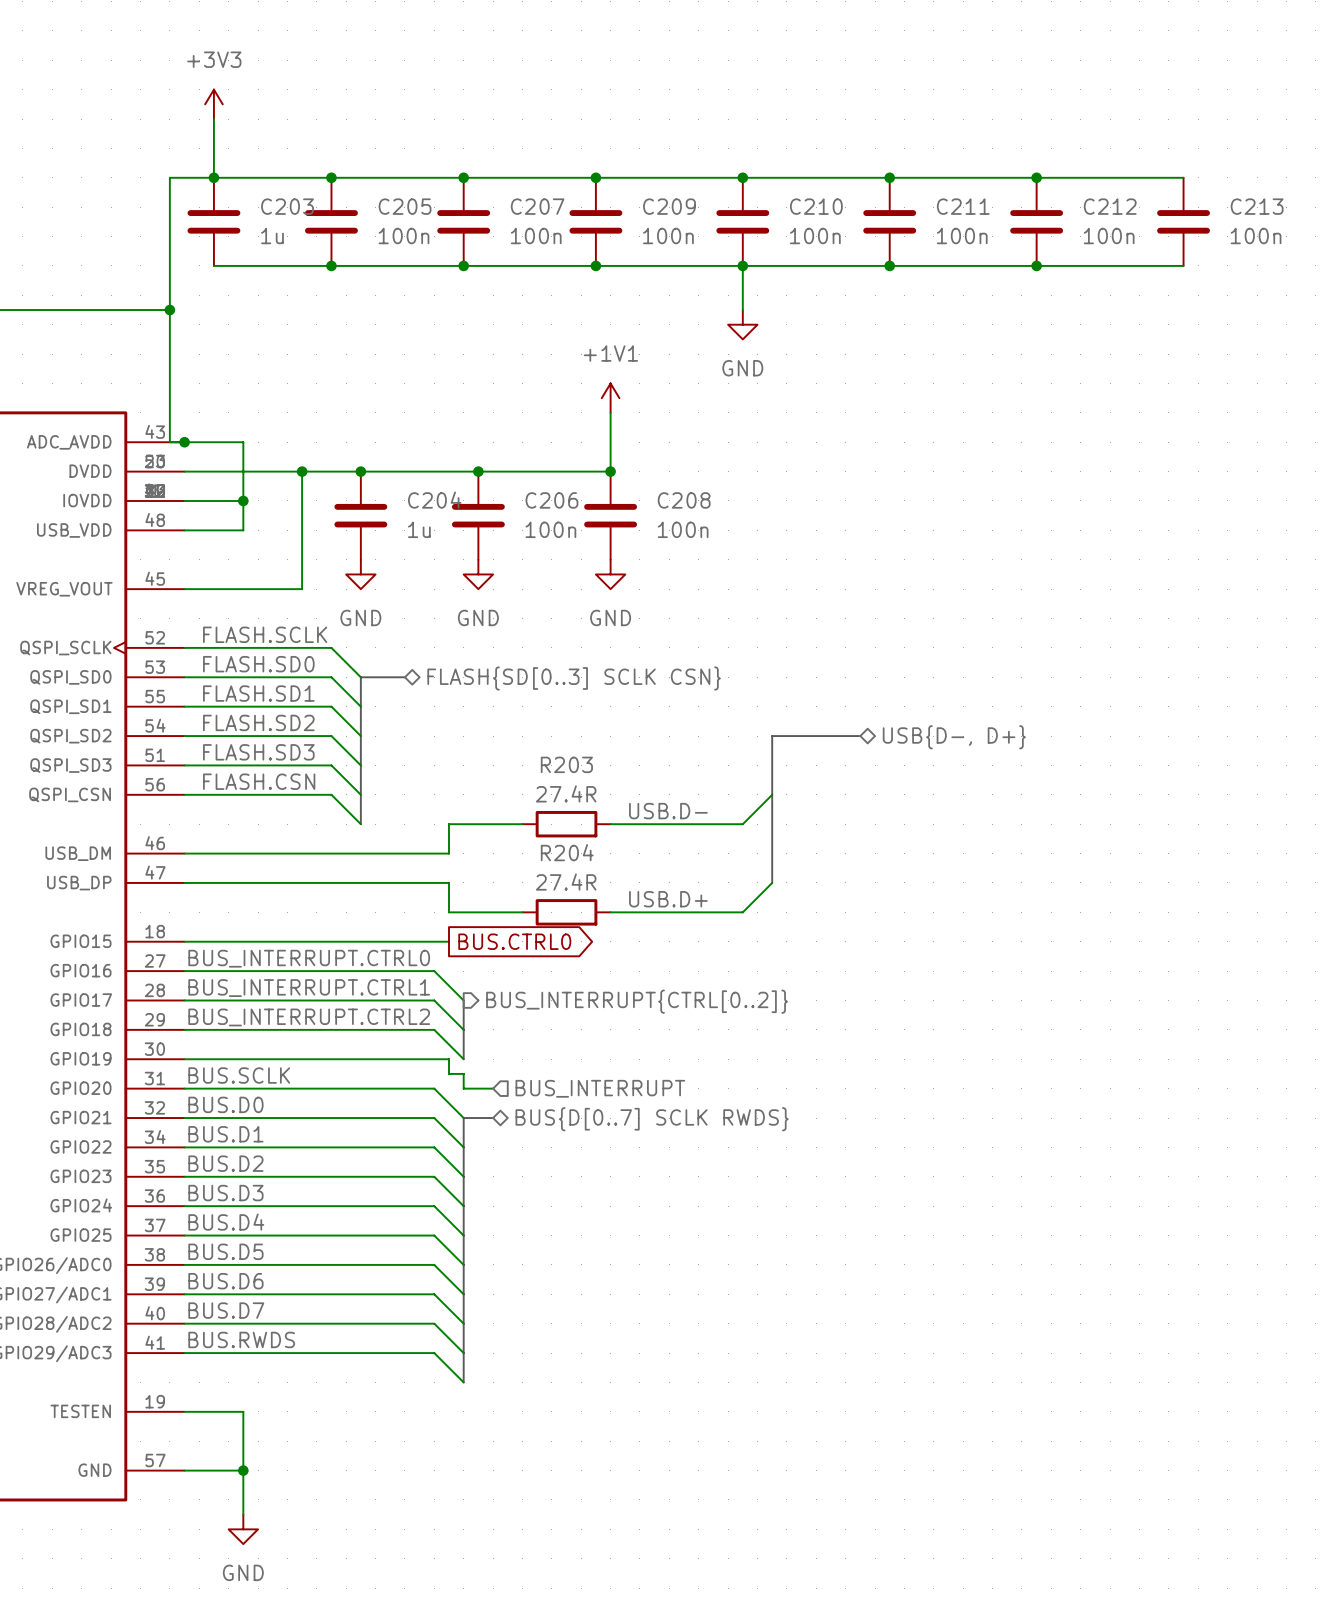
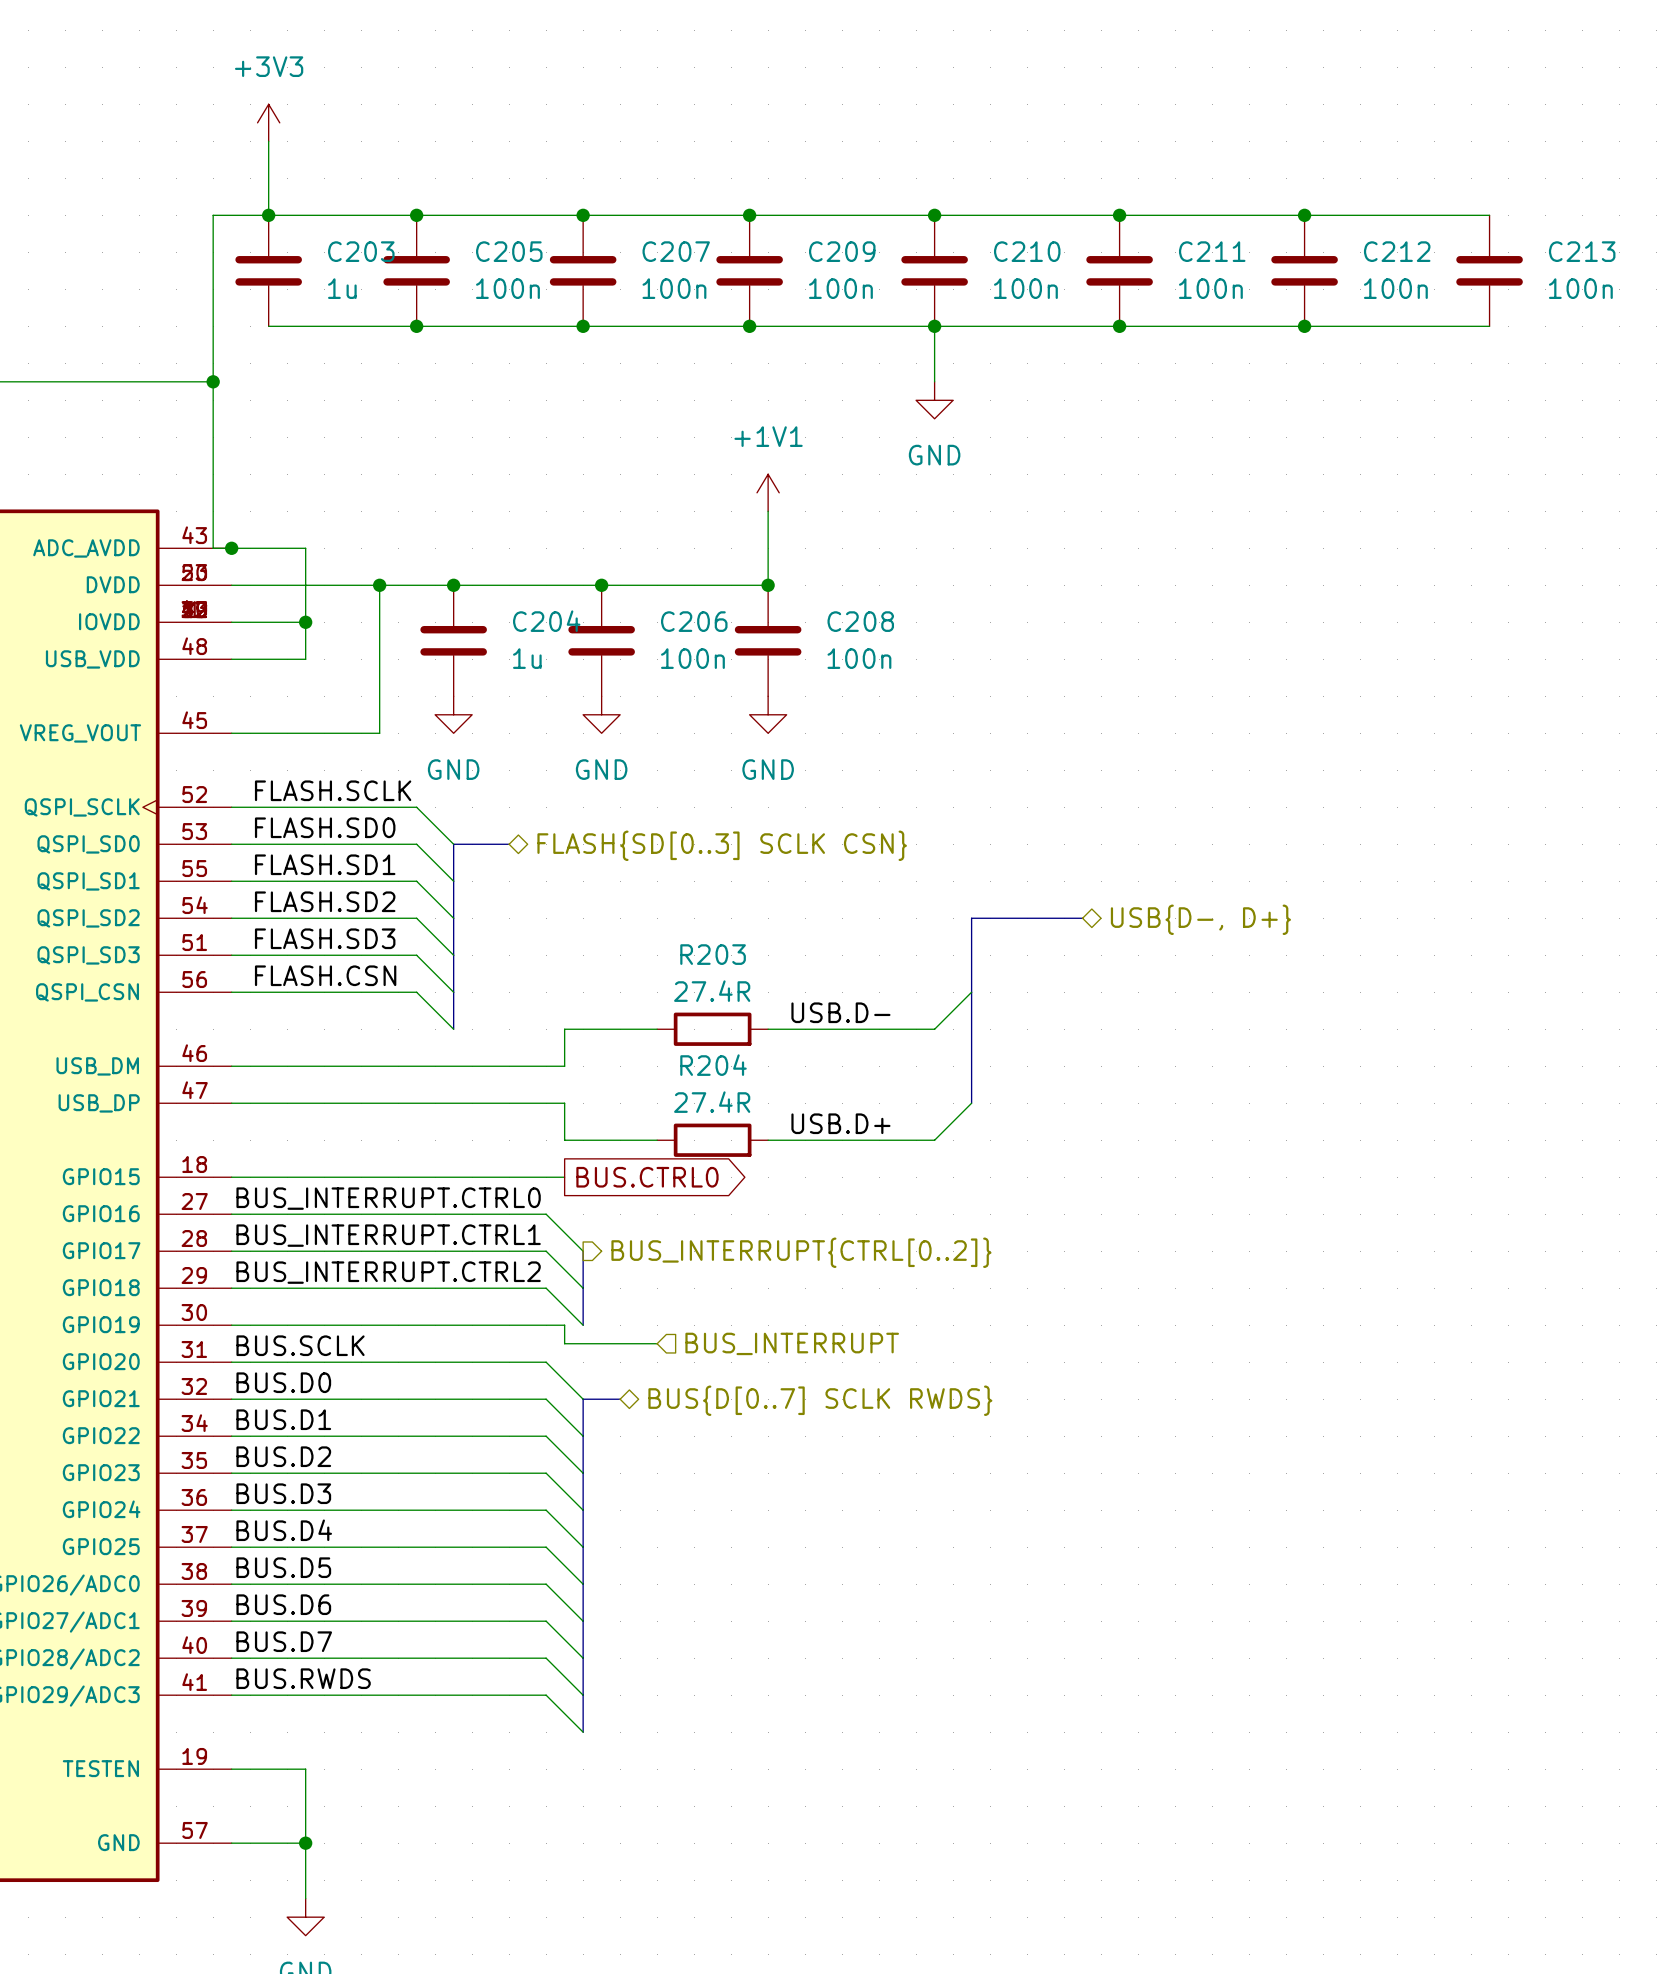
wire: (463, 1073) (463, 1088) (493, 1088) -> (583, 1343) (657, 1343)
hierarchical label position: BUS_INTERRUPT (600, 1088) -> BUS_INTERRUPT (792, 1343)

